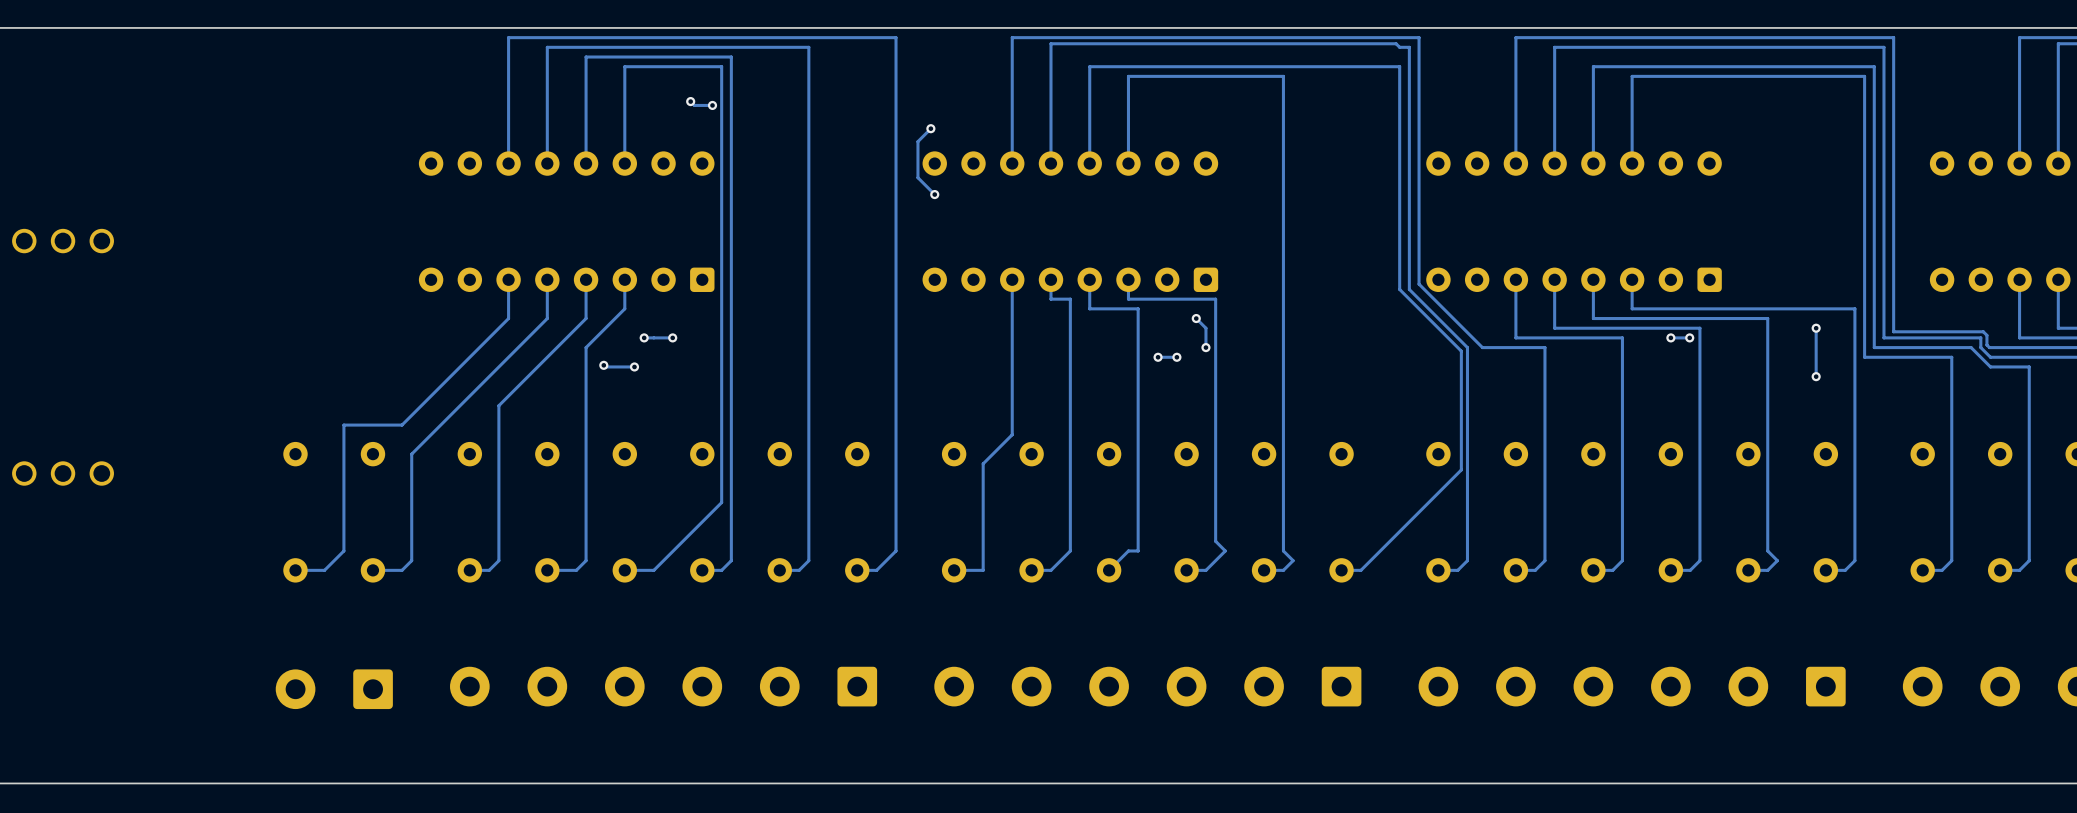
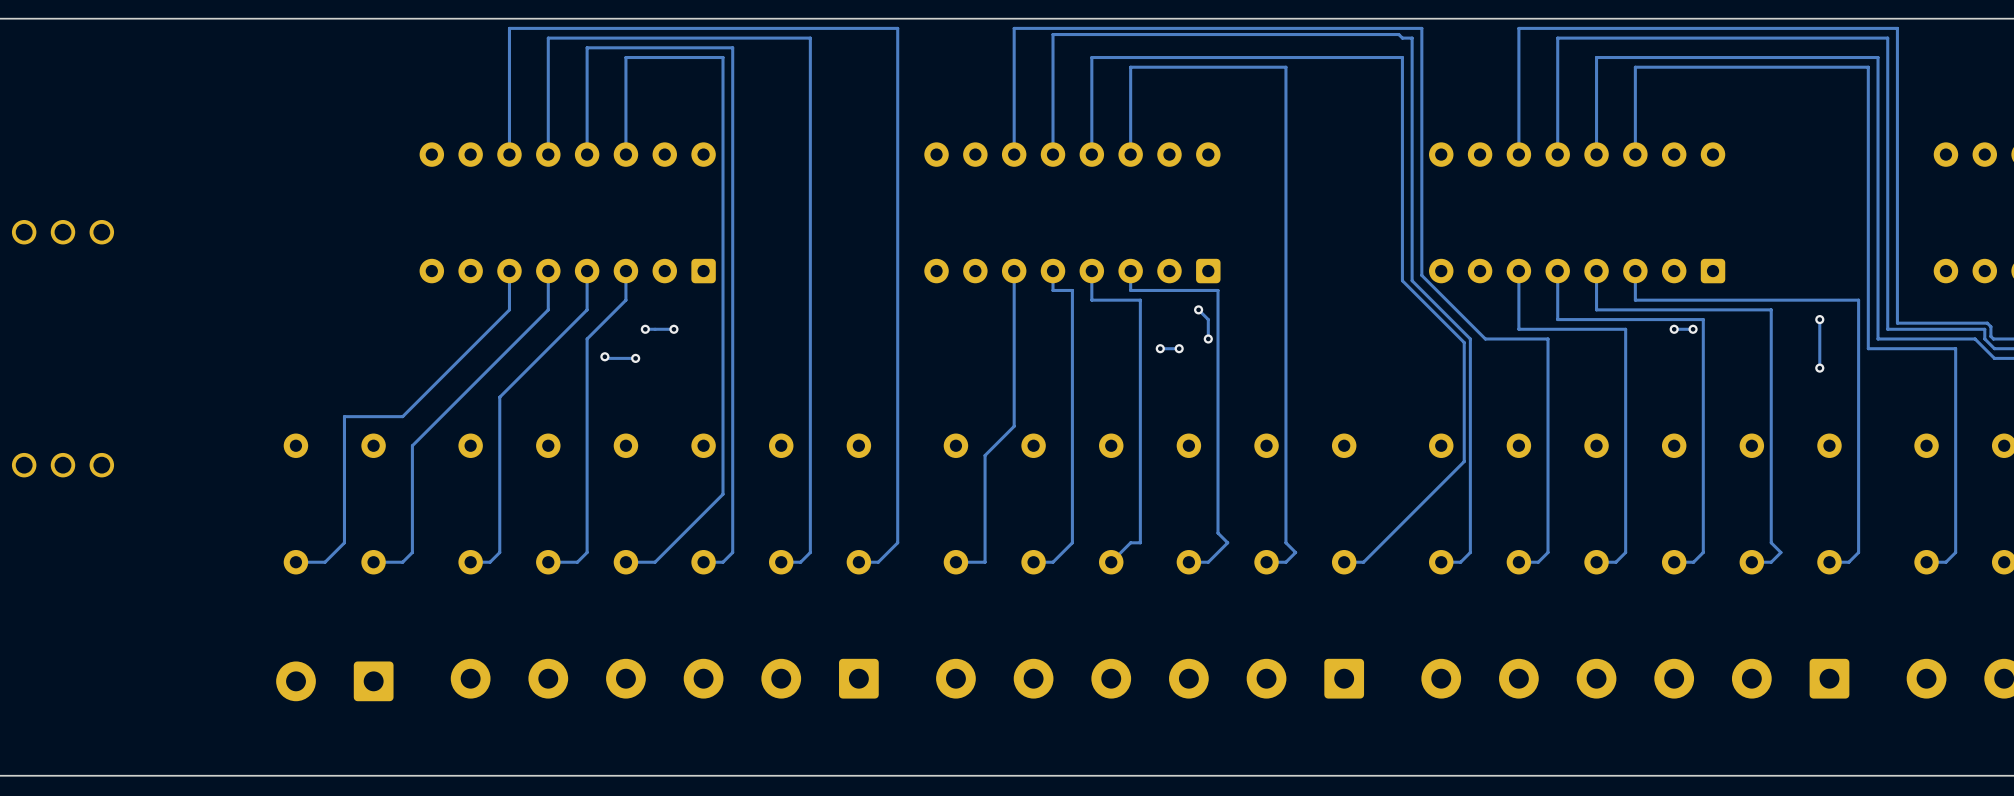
track: (690, 101) (694, 105) (712, 105) -> none
via: (690, 101) -> none
via: (712, 105) -> none
track: (930, 128) (917, 141) (917, 177) (934, 194) -> none
via: (930, 128) -> none
via: (934, 194) -> none

